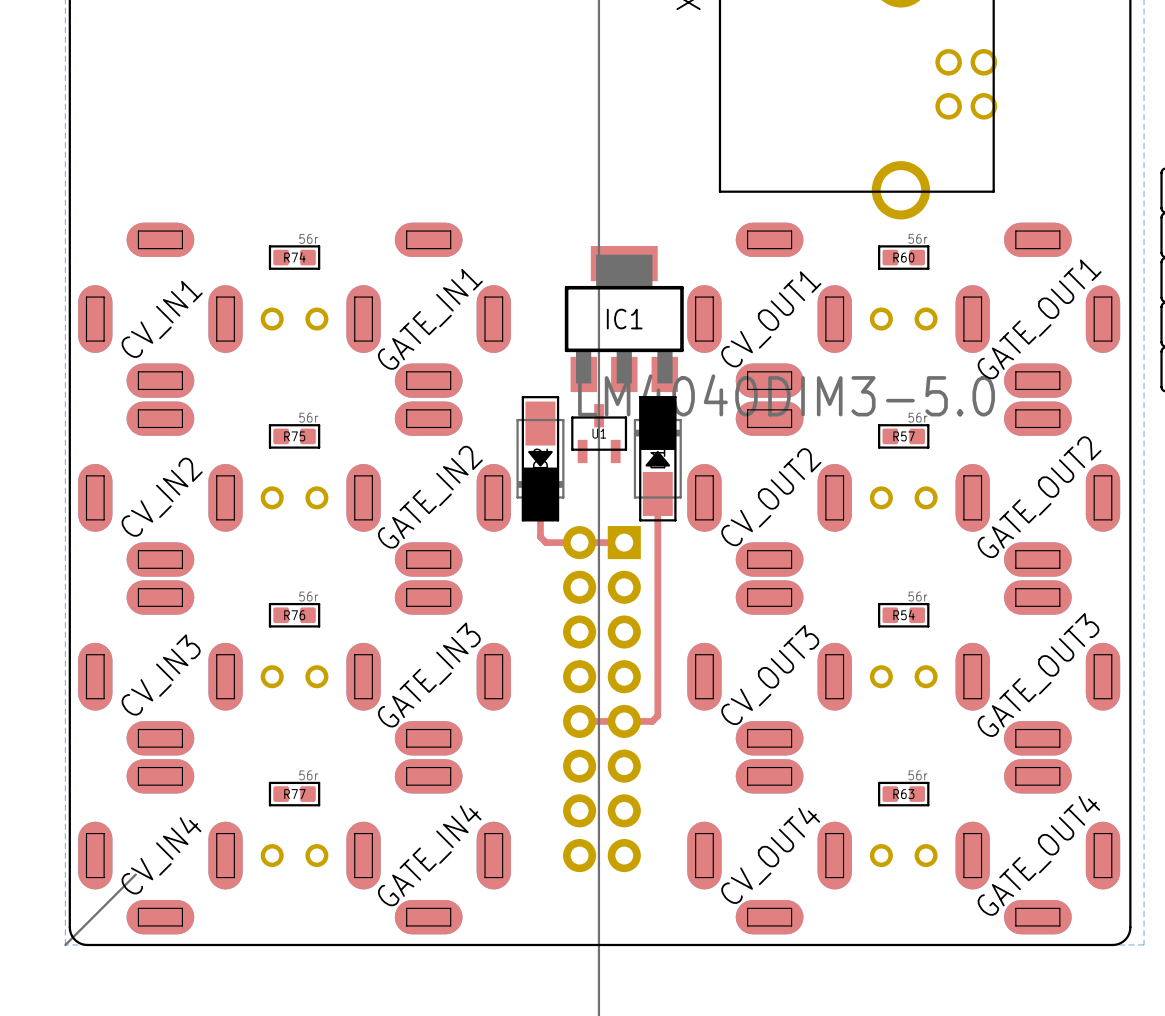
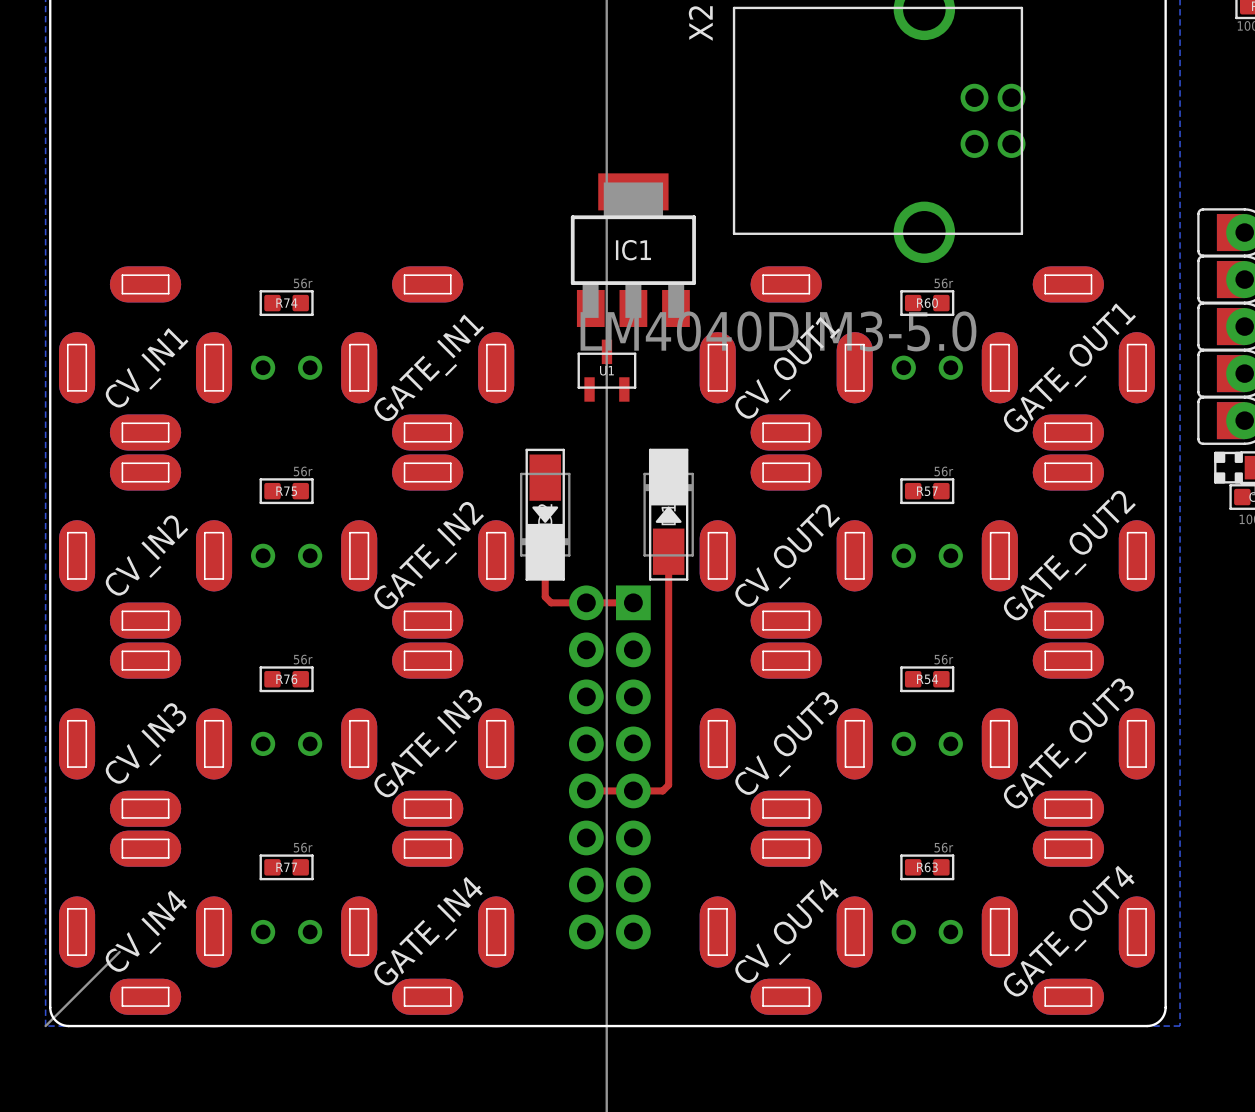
IC1 position: (624, 319) -> (633, 250)
U1 position: (599, 433) -> (606, 370)

